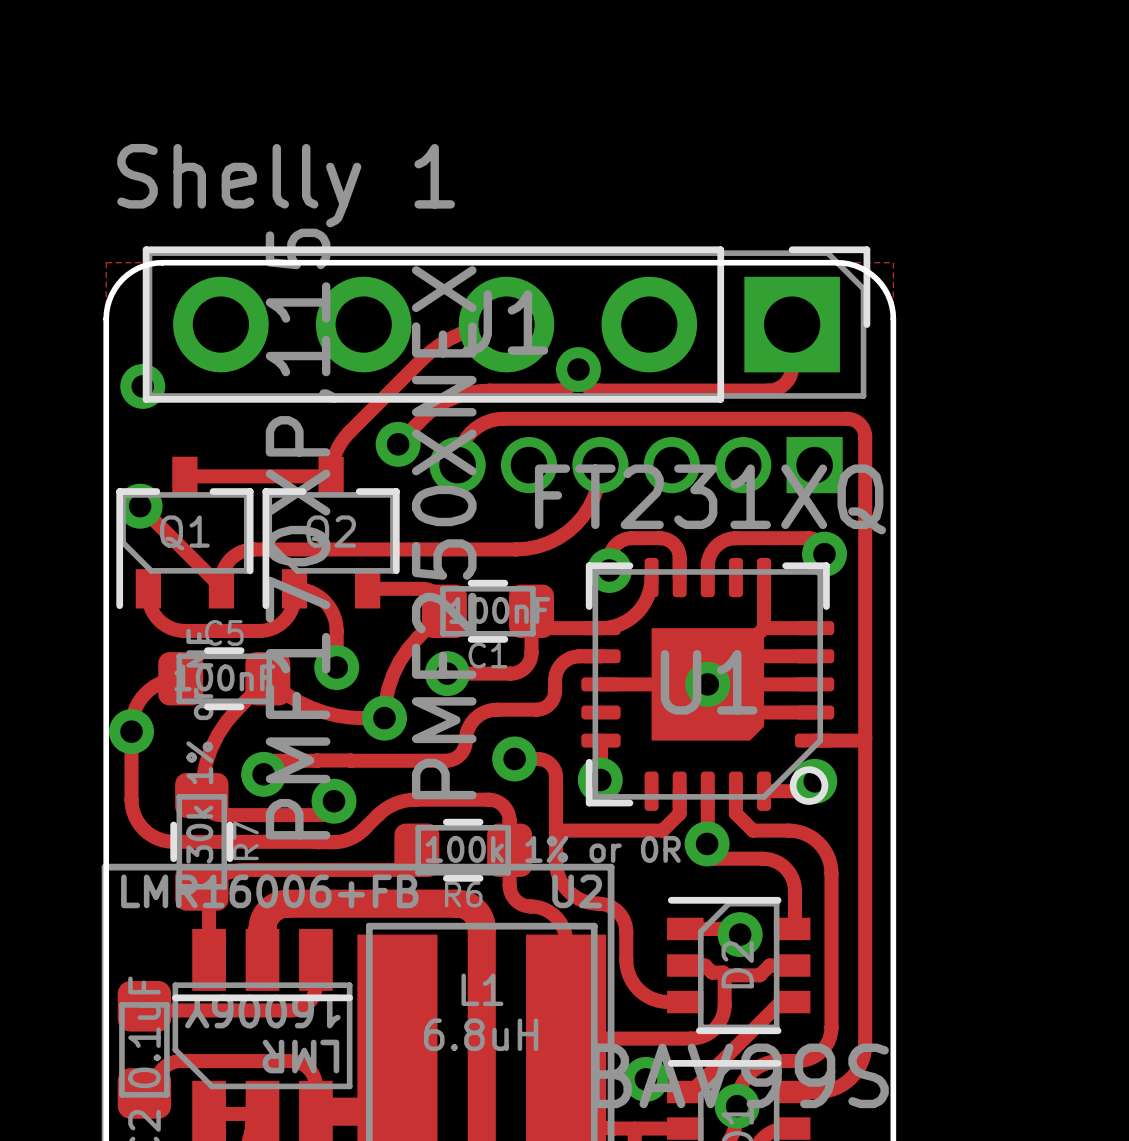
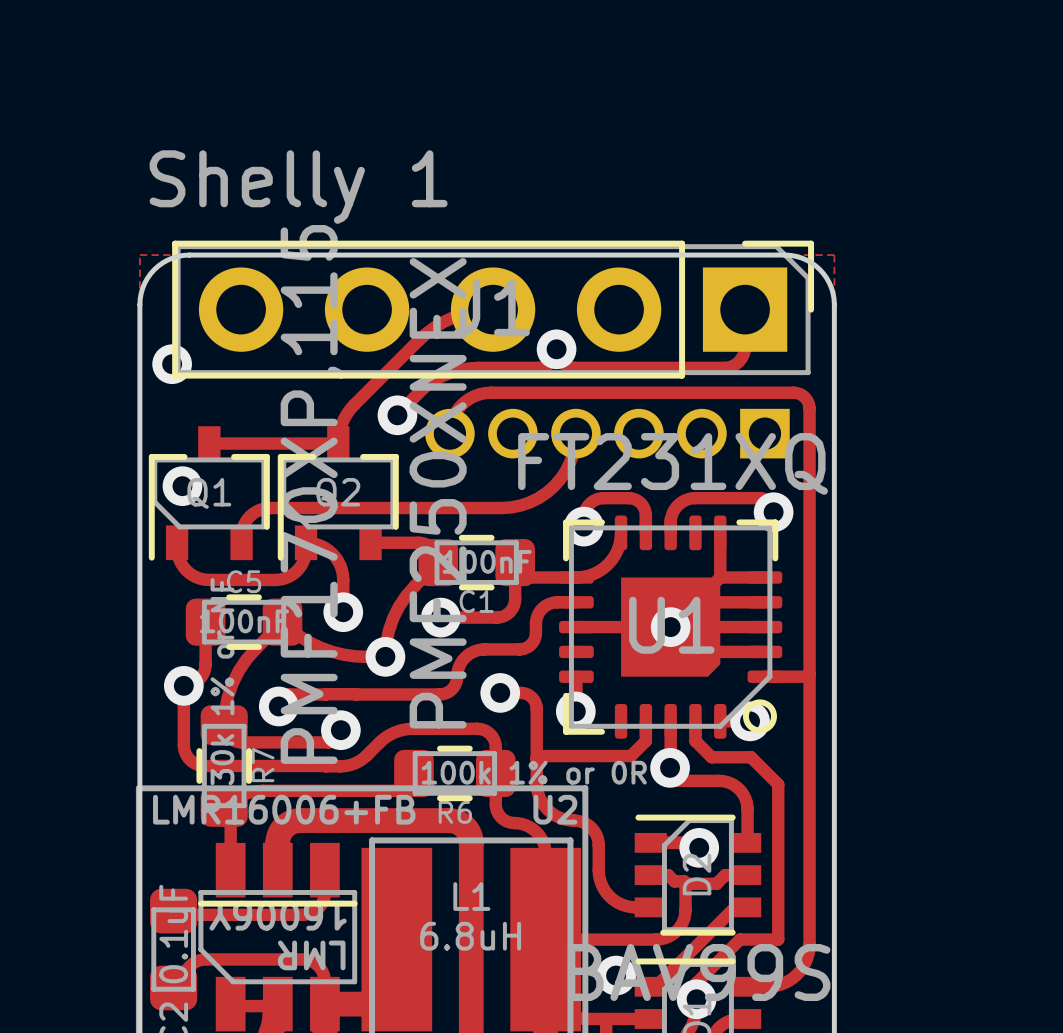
track: (140, 506) (221, 587) -> none
via position: (140, 506) -> (182, 486)
track: (180, 678) (159, 683) (145, 693) (134, 711) (131, 727) (131, 799) (134, 815) (143, 829) (152, 836) (162, 840) (179, 841) -> (205, 622) (204, 671) (197, 681) (183, 685) (184, 750) (192, 761) (204, 766)
via position: (131, 731) -> (183, 685)
via position: (814, 781) -> (750, 721)
track: (752, 830) (788, 830) (802, 832) (818, 843) (829, 859) (831, 873) (831, 1031) (824, 1048) (812, 1057) (801, 1060) (771, 1062) (753, 1070) (741, 1085) (737, 1104) -> (710, 756) (751, 757) (778, 784) (778, 939) (740, 939) (696, 982) (696, 997)

